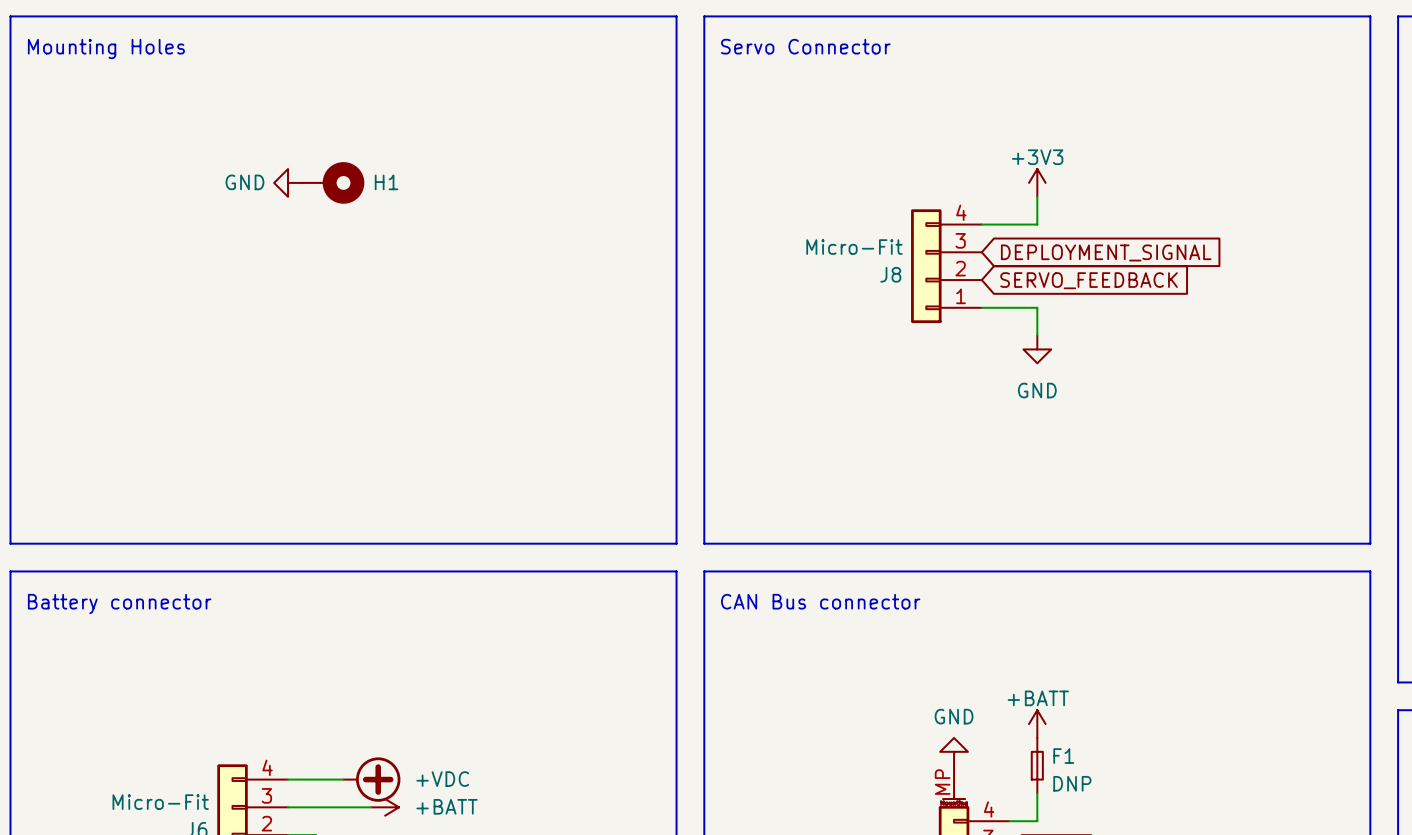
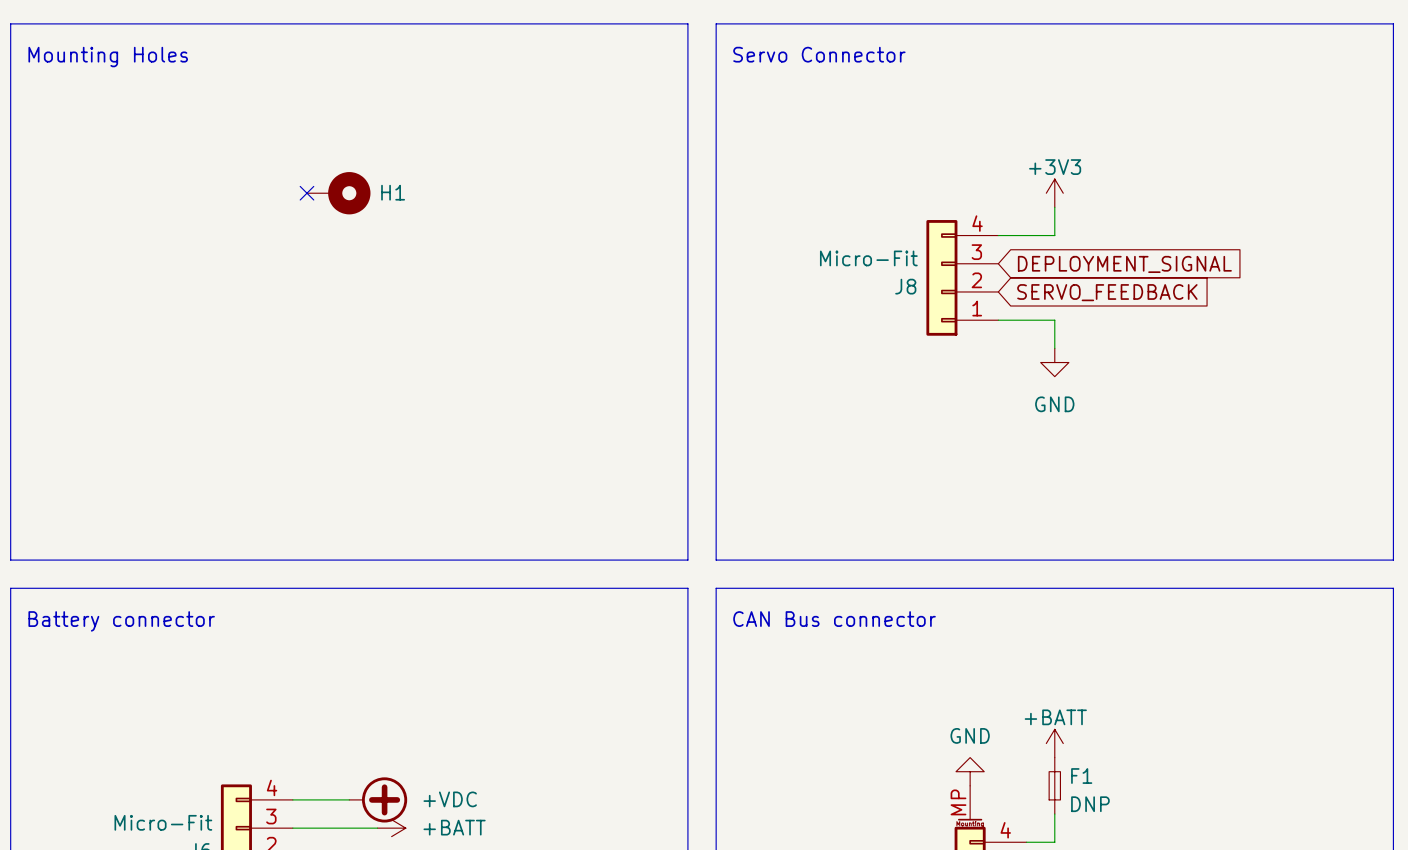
power symbol: GND (288, 182) -> none
no-connect mark: none -> (306, 193)

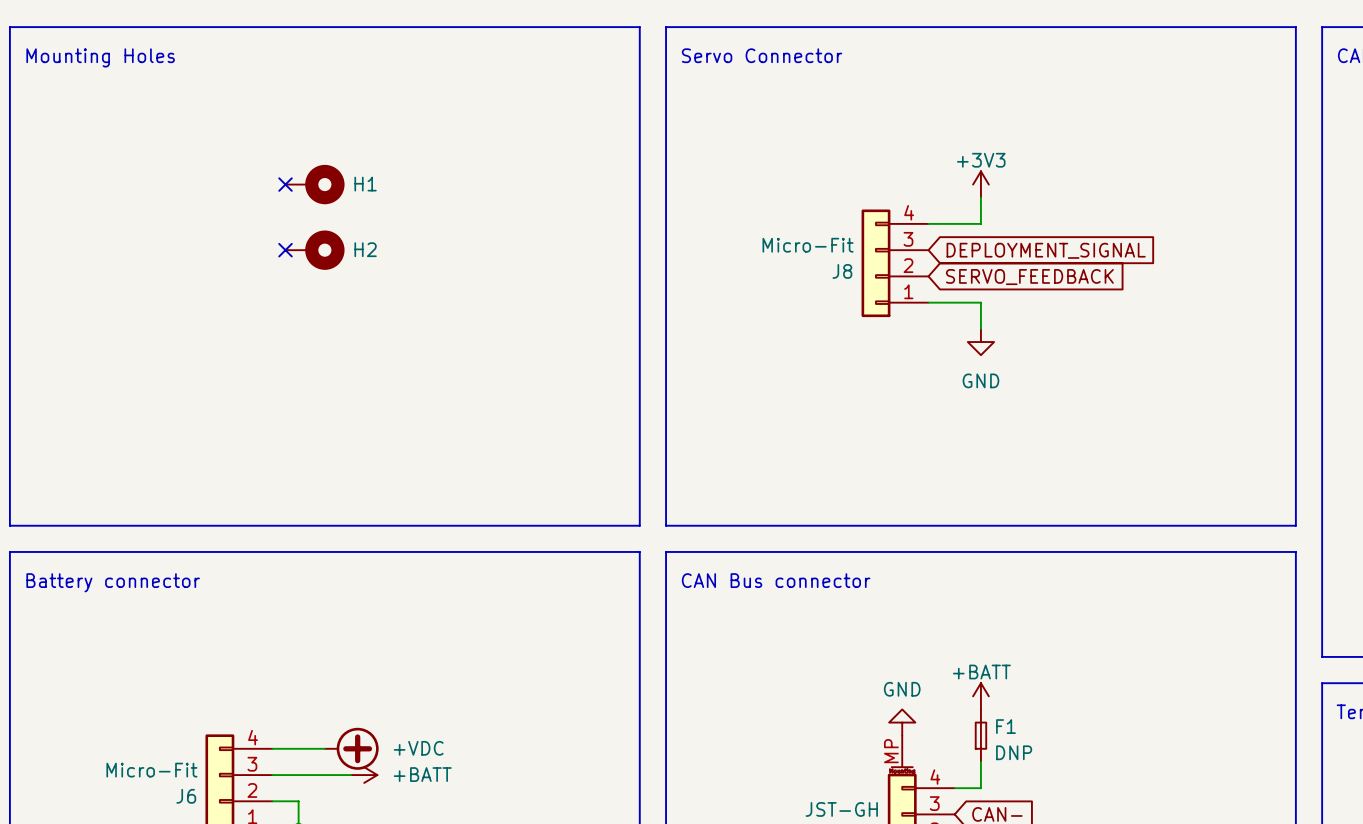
no-connect mark: none -> (285, 250)
H2: none -> (315, 250)

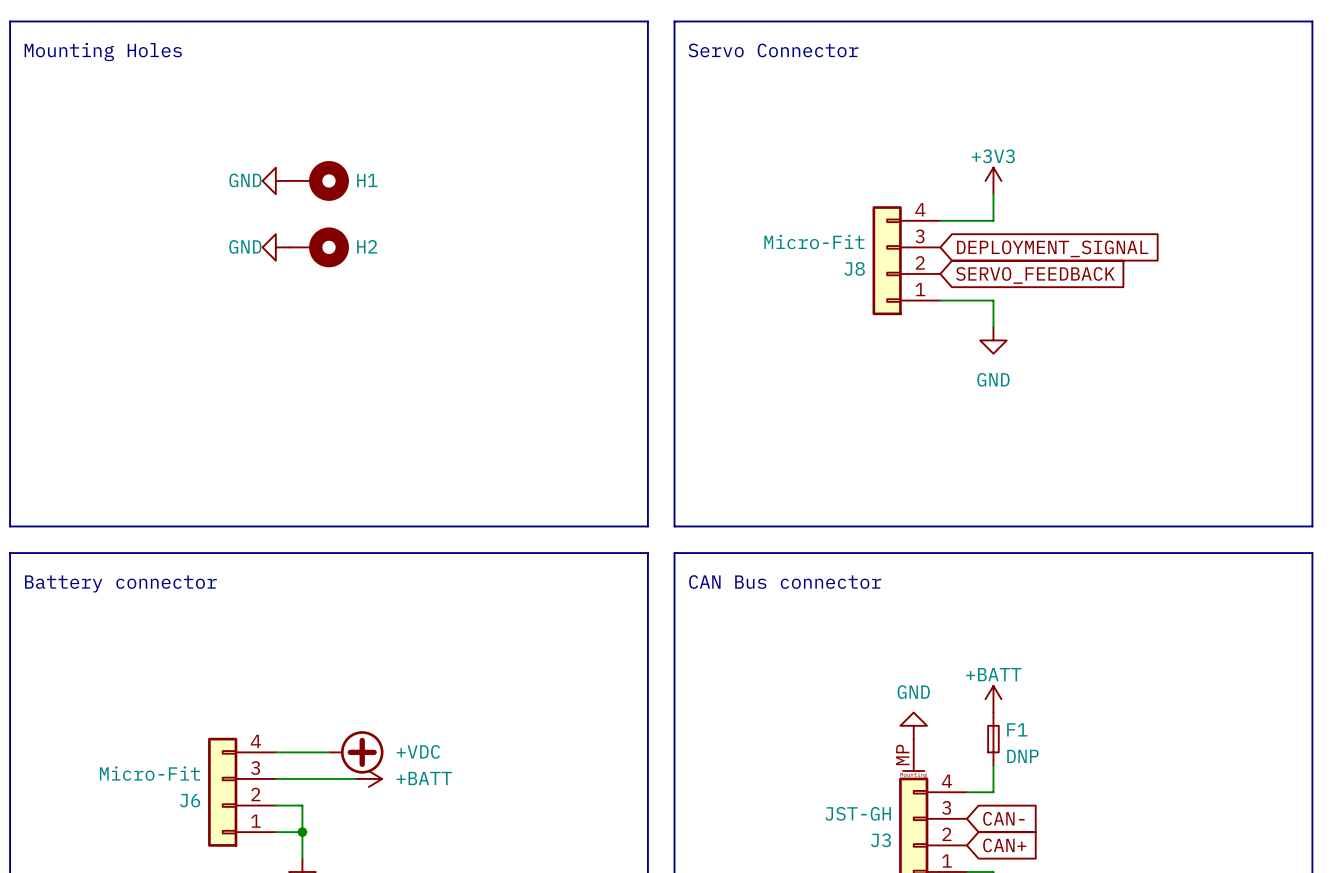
power symbol: none -> GND (275, 180)
no-connect mark: (285, 184) -> none
power symbol: none -> GND (275, 247)
no-connect mark: (285, 250) -> none

